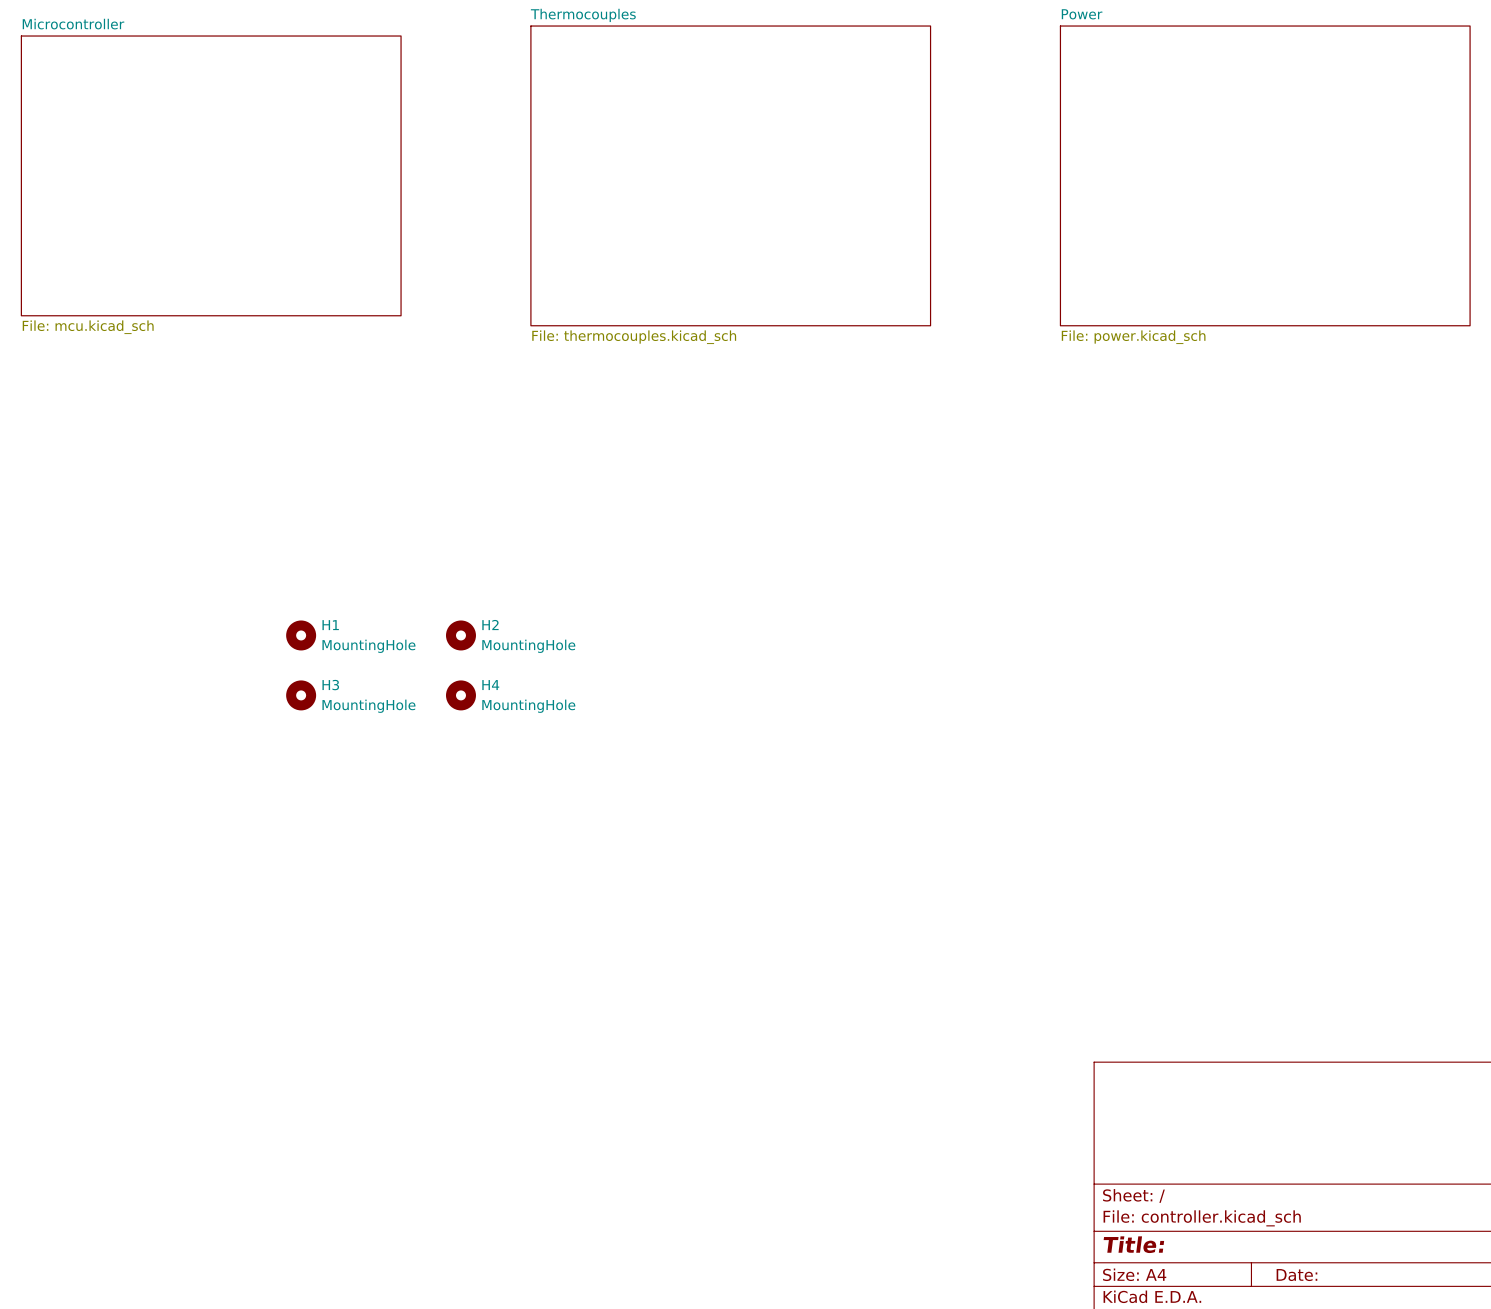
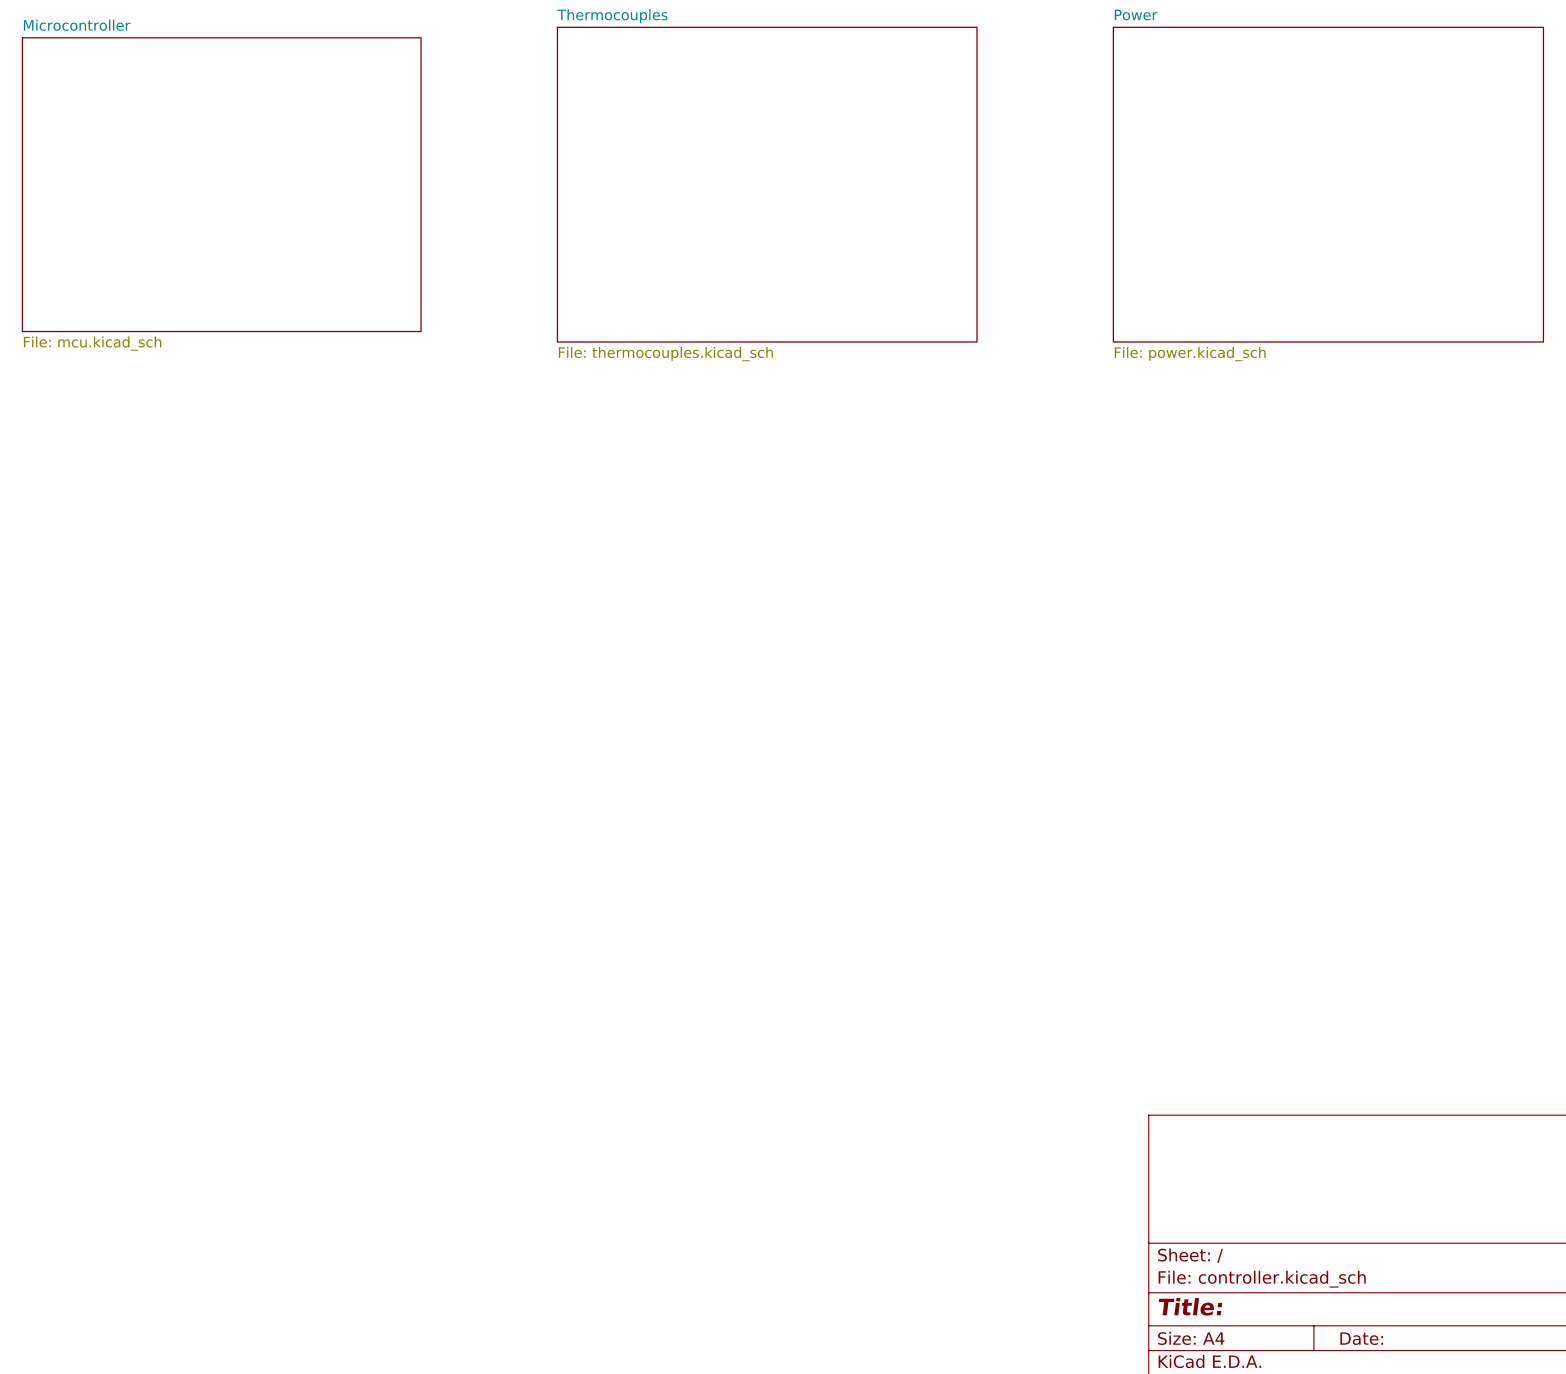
H1: MountingHole (301, 635) -> none
H2: MountingHole (460, 635) -> none
H3: MountingHole (301, 695) -> none
H4: MountingHole (460, 695) -> none

